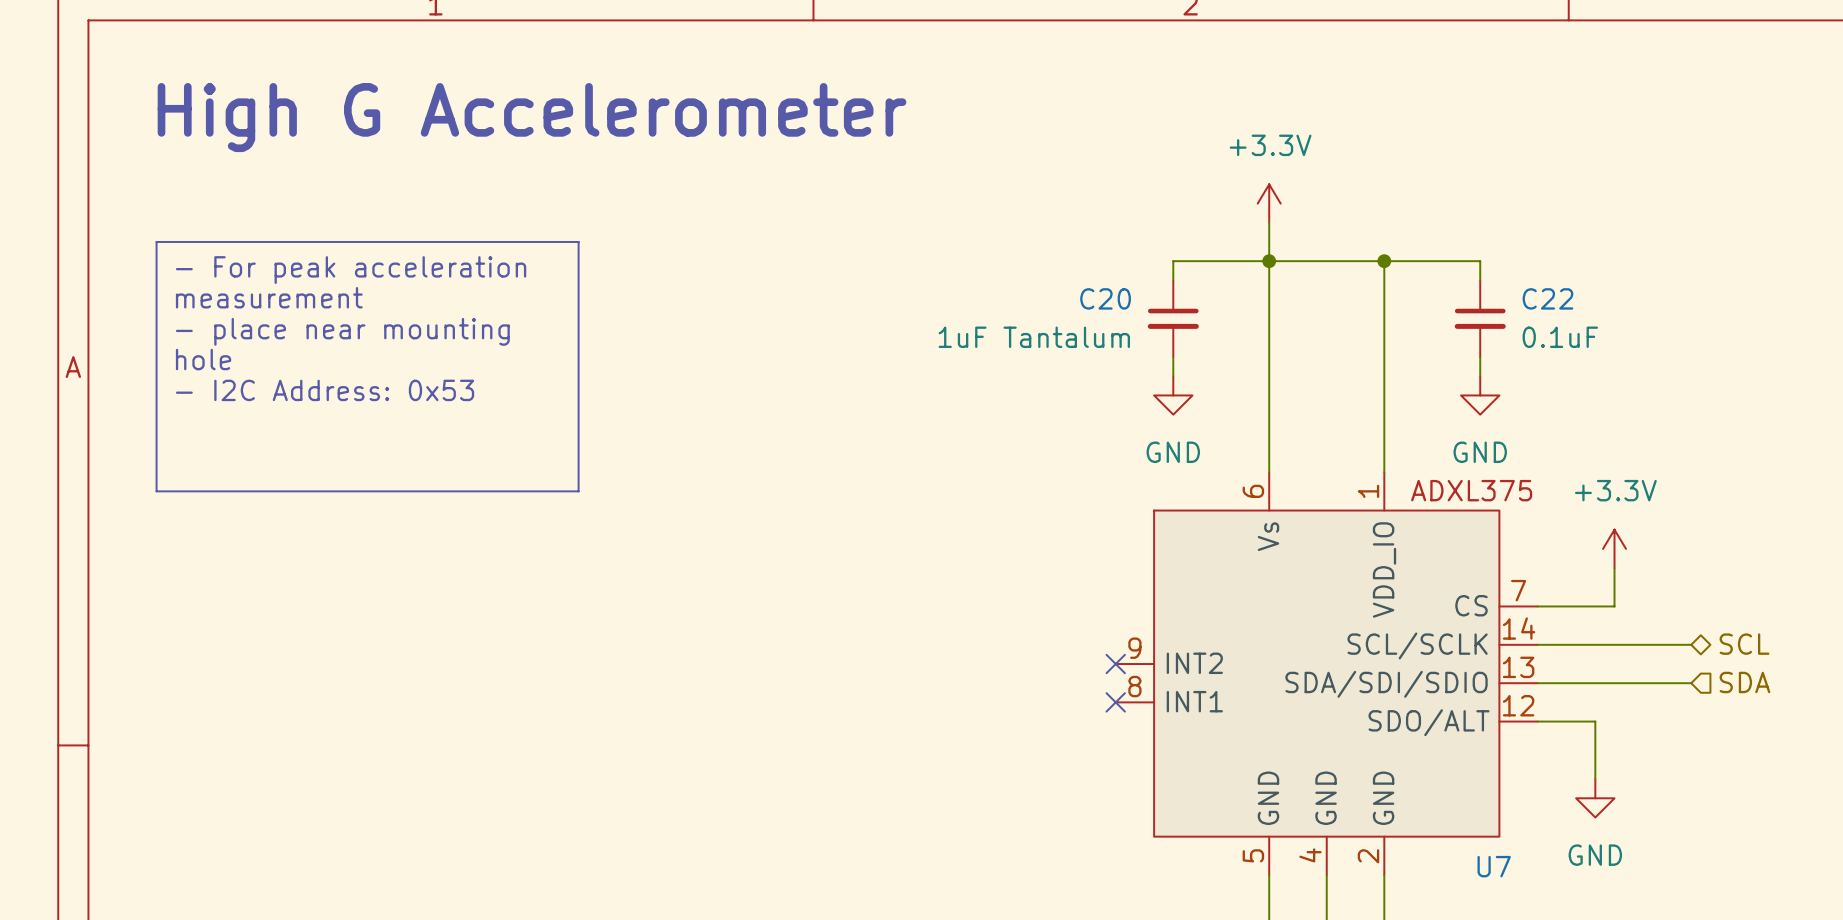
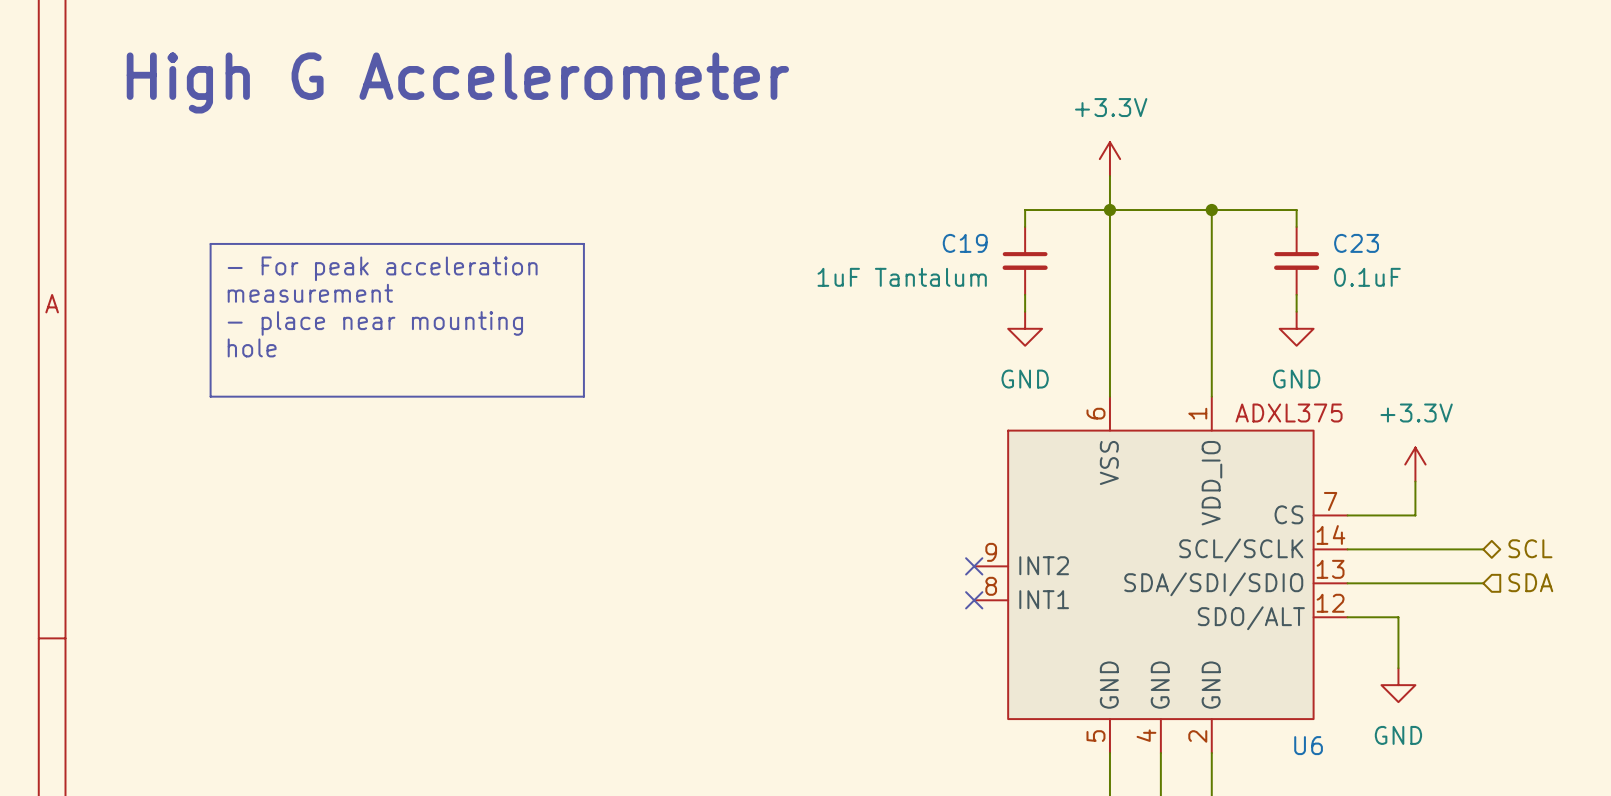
line: (156, 241) (578, 241) (578, 491) (156, 491) (156, 241) -> none
text position: - For peak acceleration (351, 270) -> - For peak acceleration (382, 268)
text position: measurement (269, 297) -> measurement (310, 293)
C20 name: C20 (1105, 298) -> C19 (965, 243)
C22 name: C22 (1547, 298) -> C23 (1356, 243)
line: none -> (210, 243) (583, 243) (583, 396) (210, 396) (210, 243)
text position: - place near mounting (342, 331) -> - place near mounting (375, 323)
text position: hole (203, 359) -> hole (252, 347)
text: - I2C Address: 0x53 (325, 390) -> none
U7 pin name: Vs (1268, 536) -> VSS (1109, 462)
U7 name: U7 (1494, 866) -> U6 (1308, 745)

